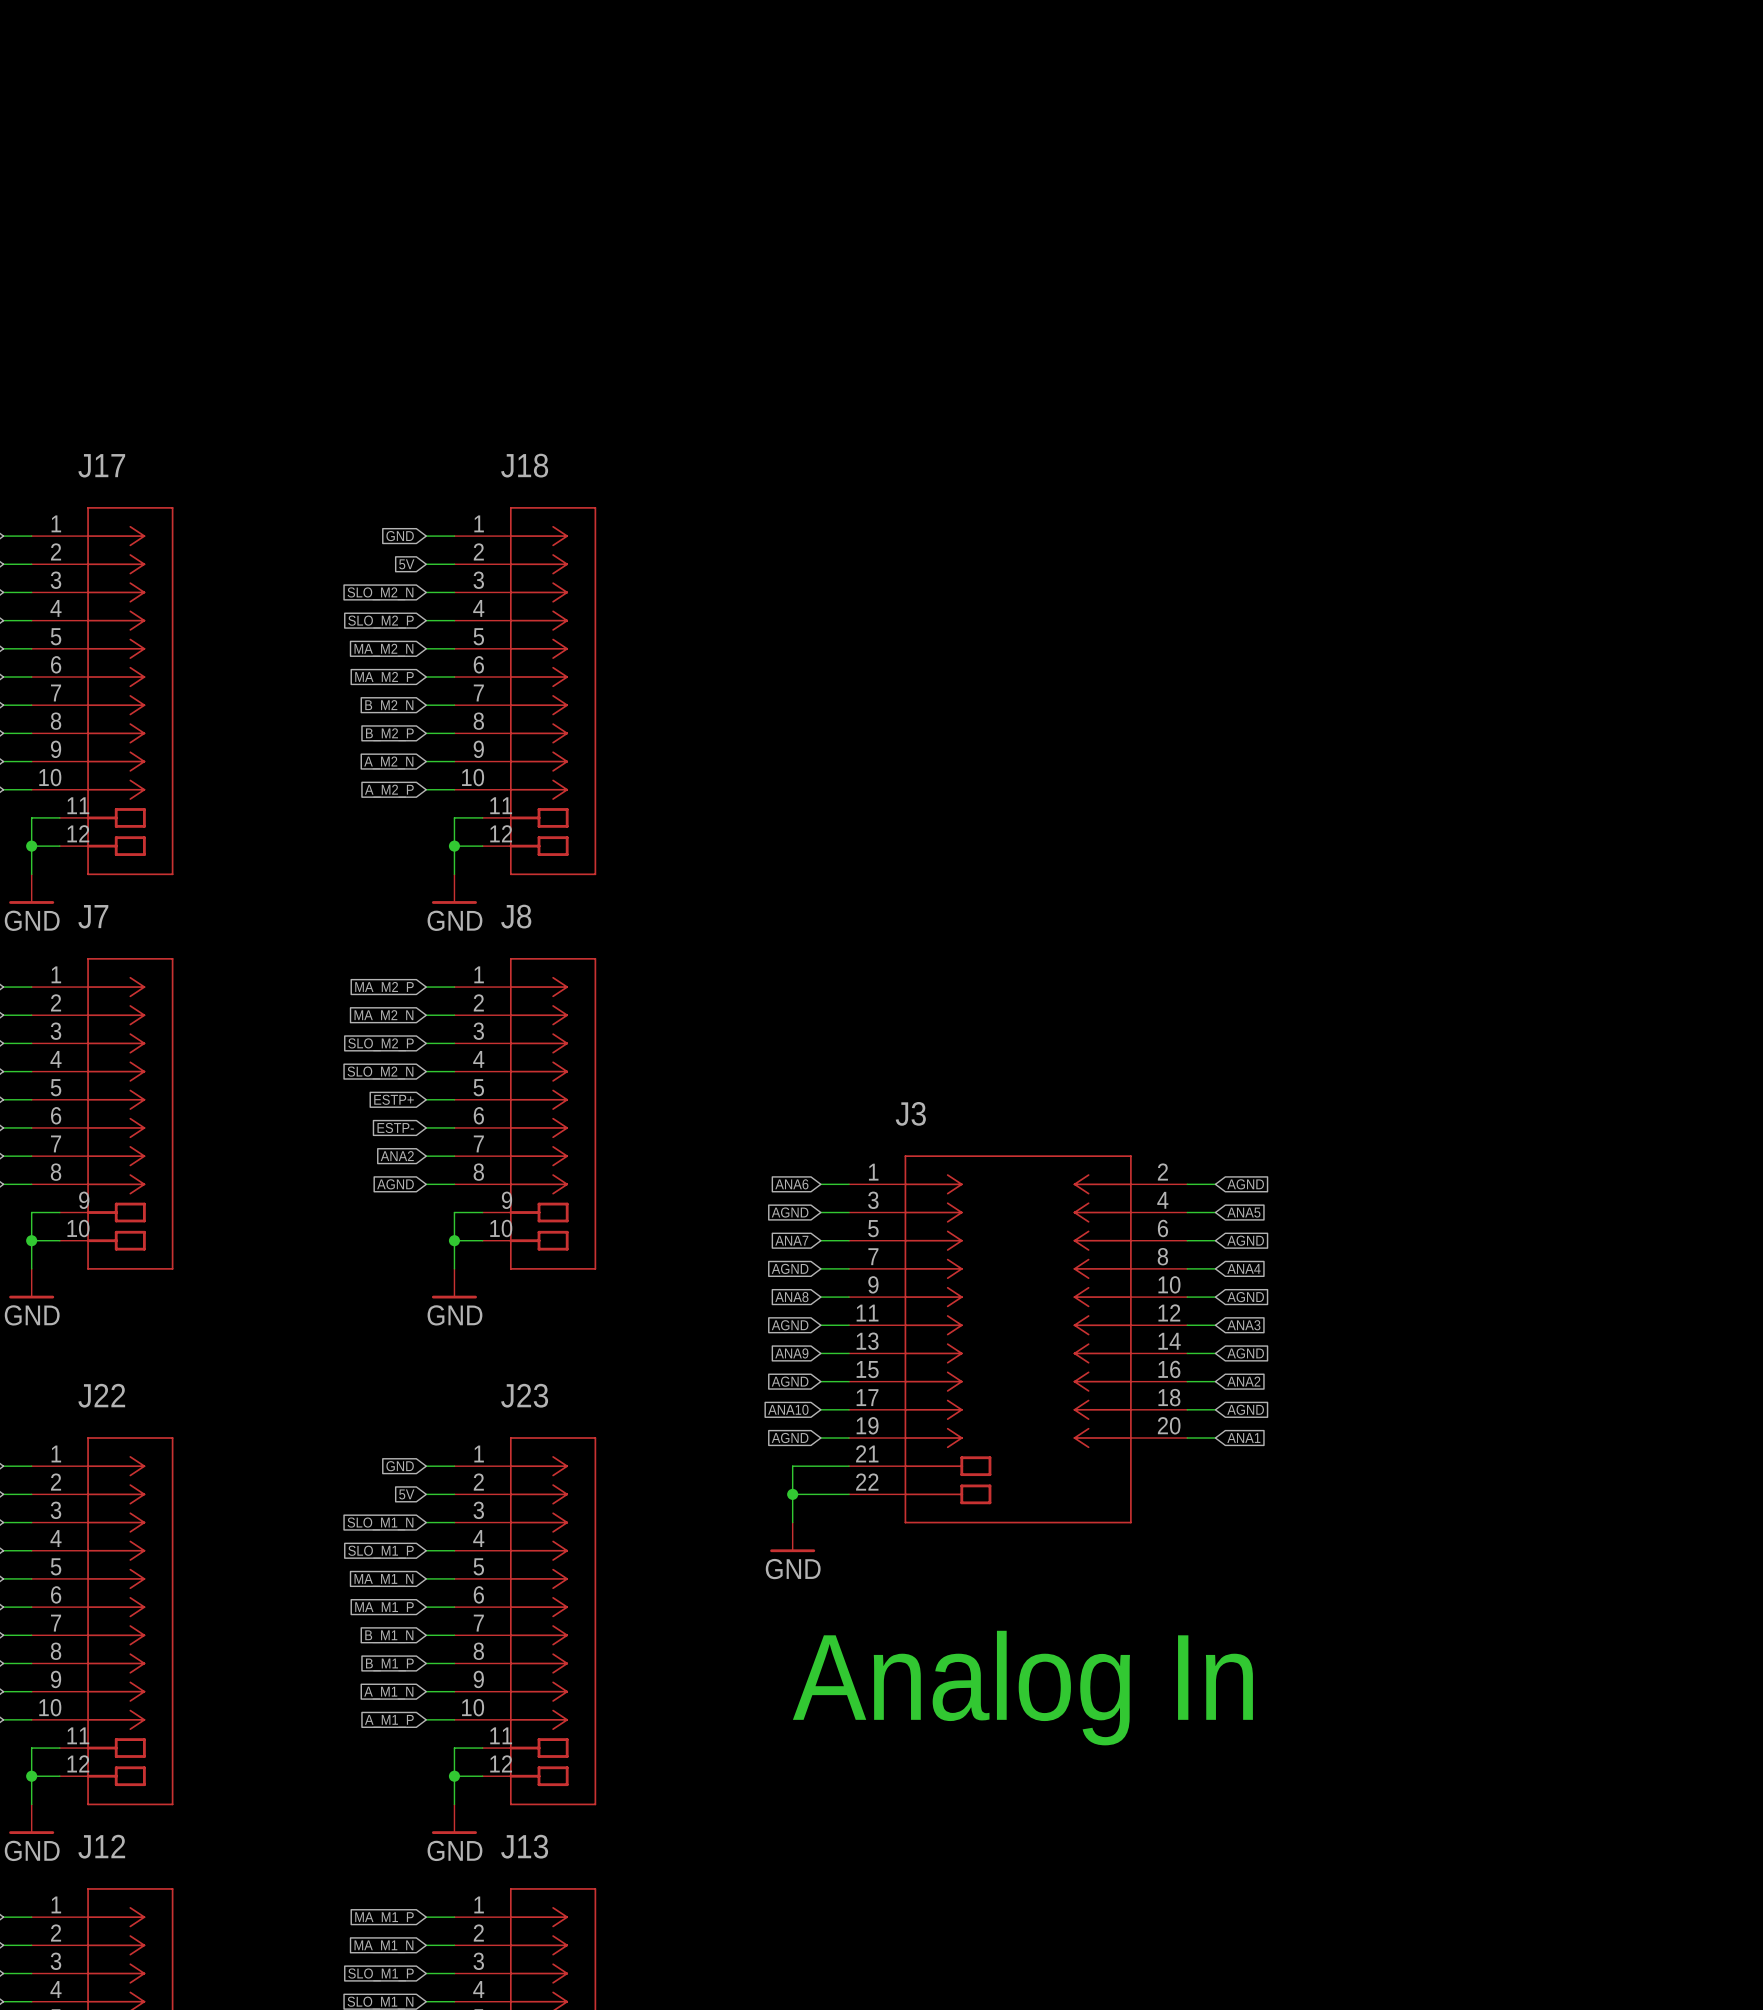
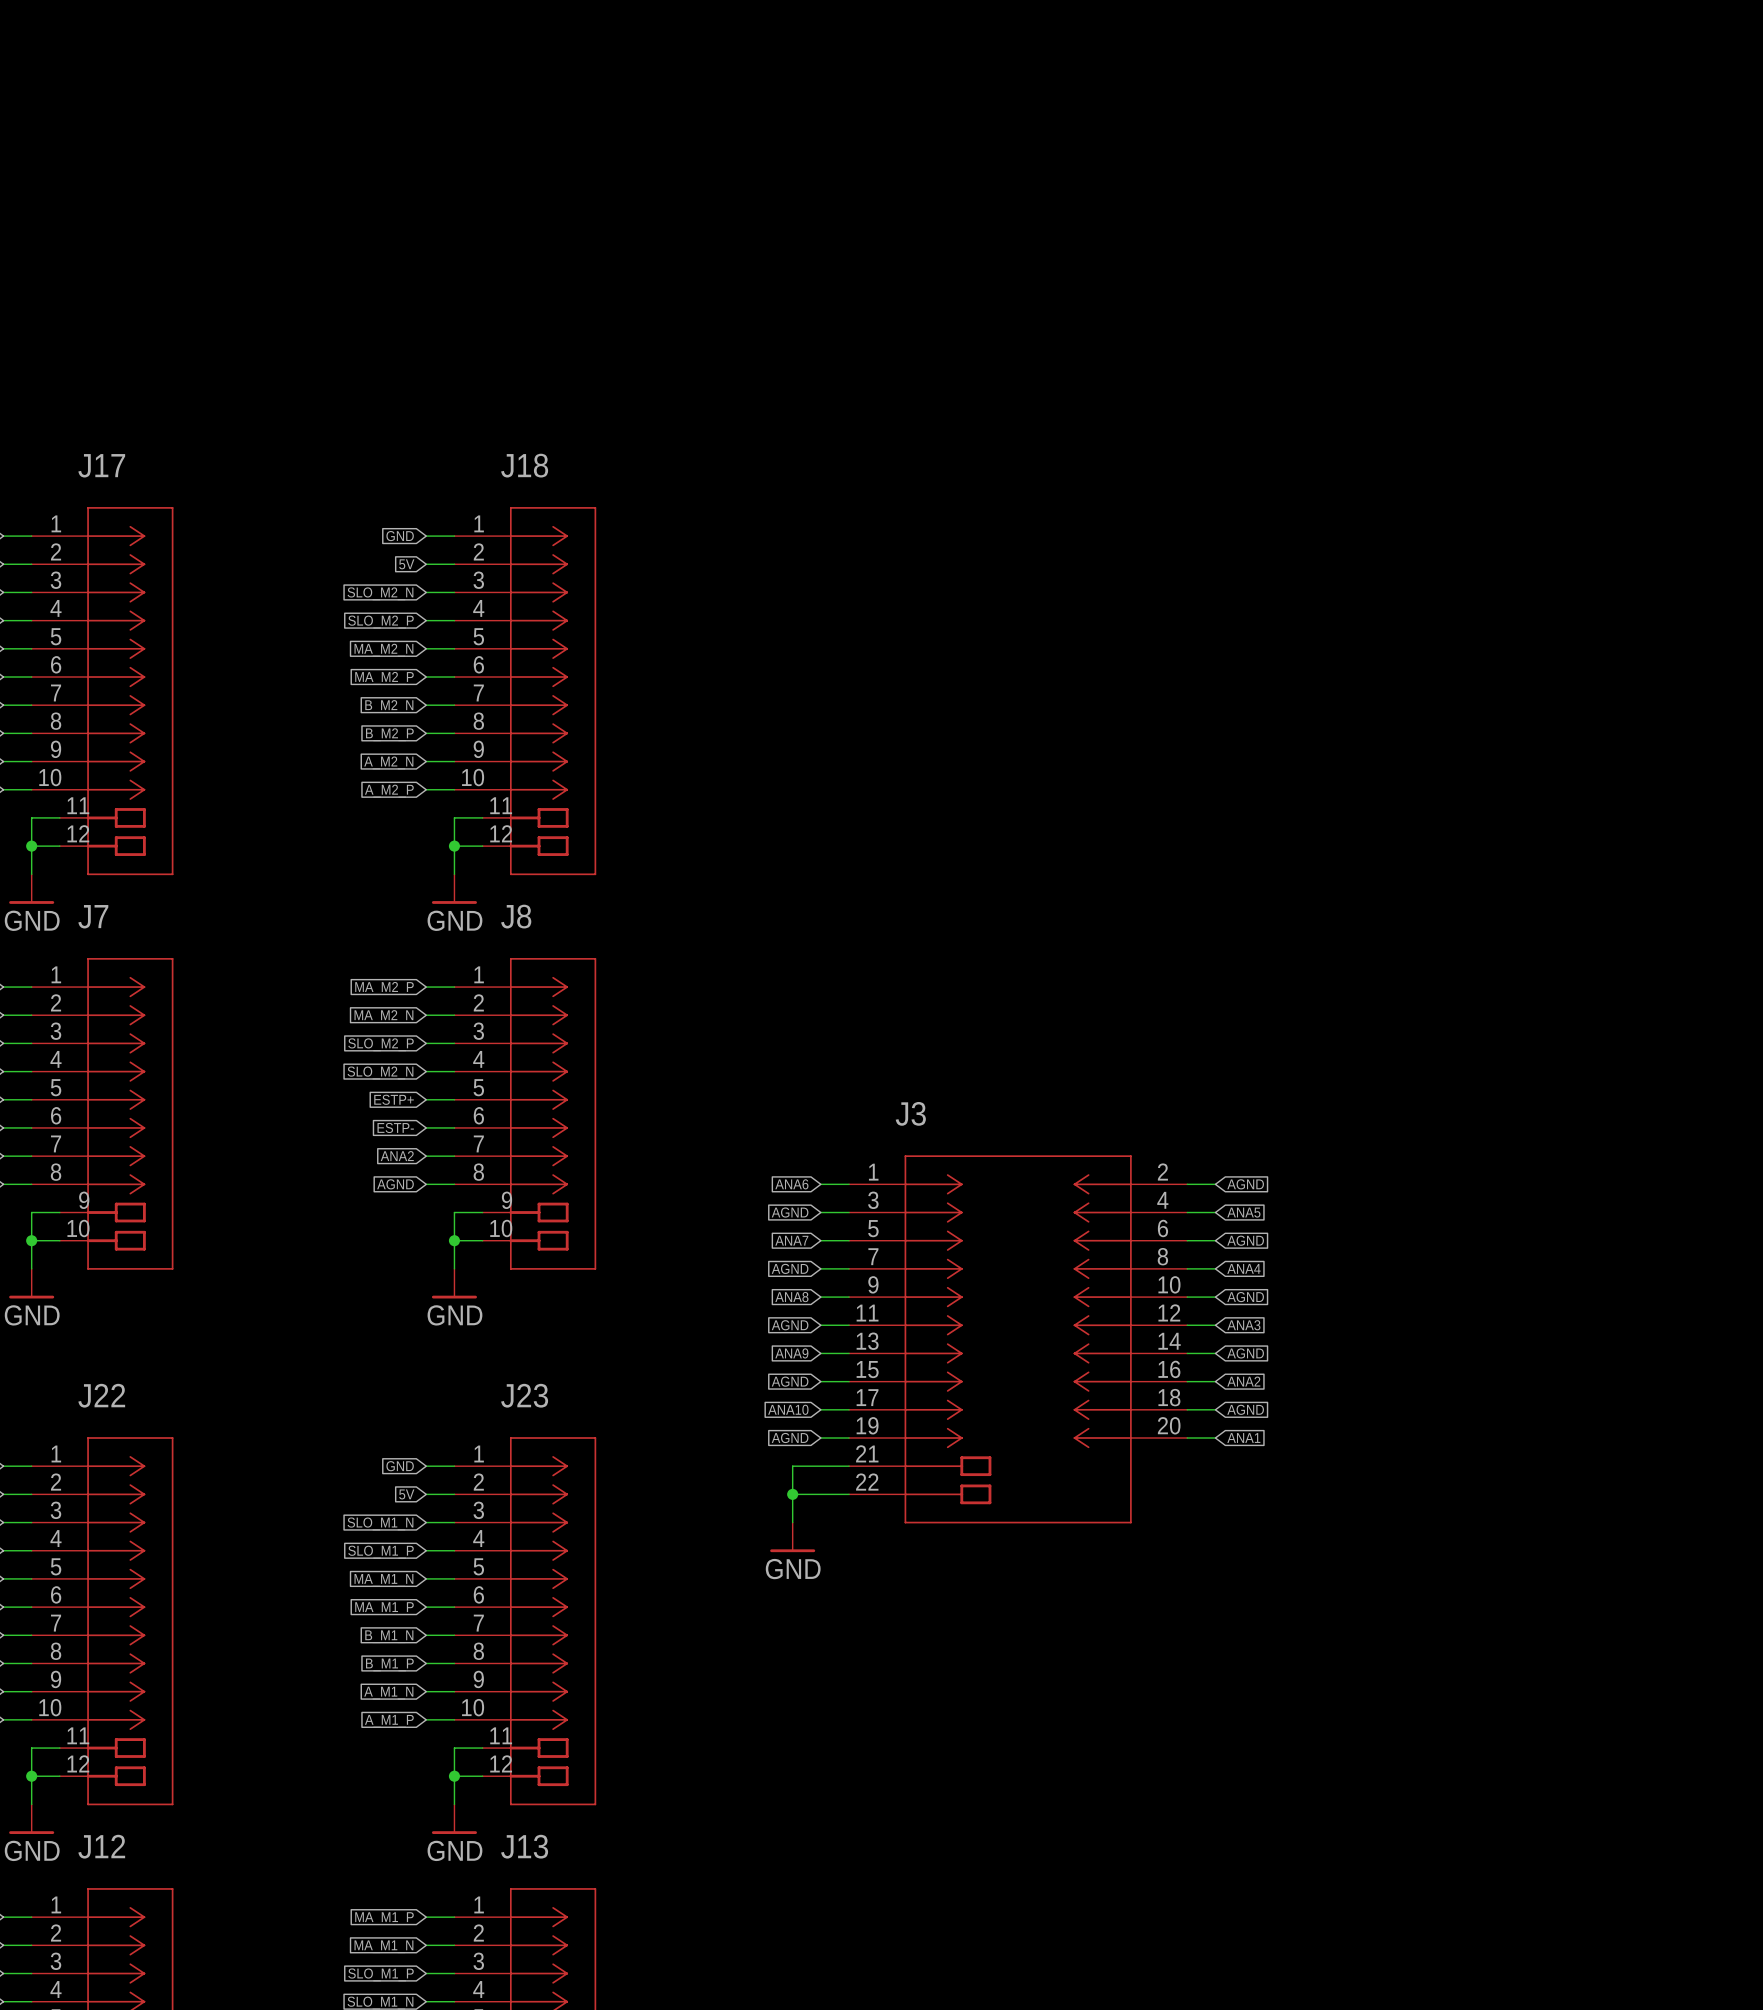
text: Analog In (1022, 1688) -> none

